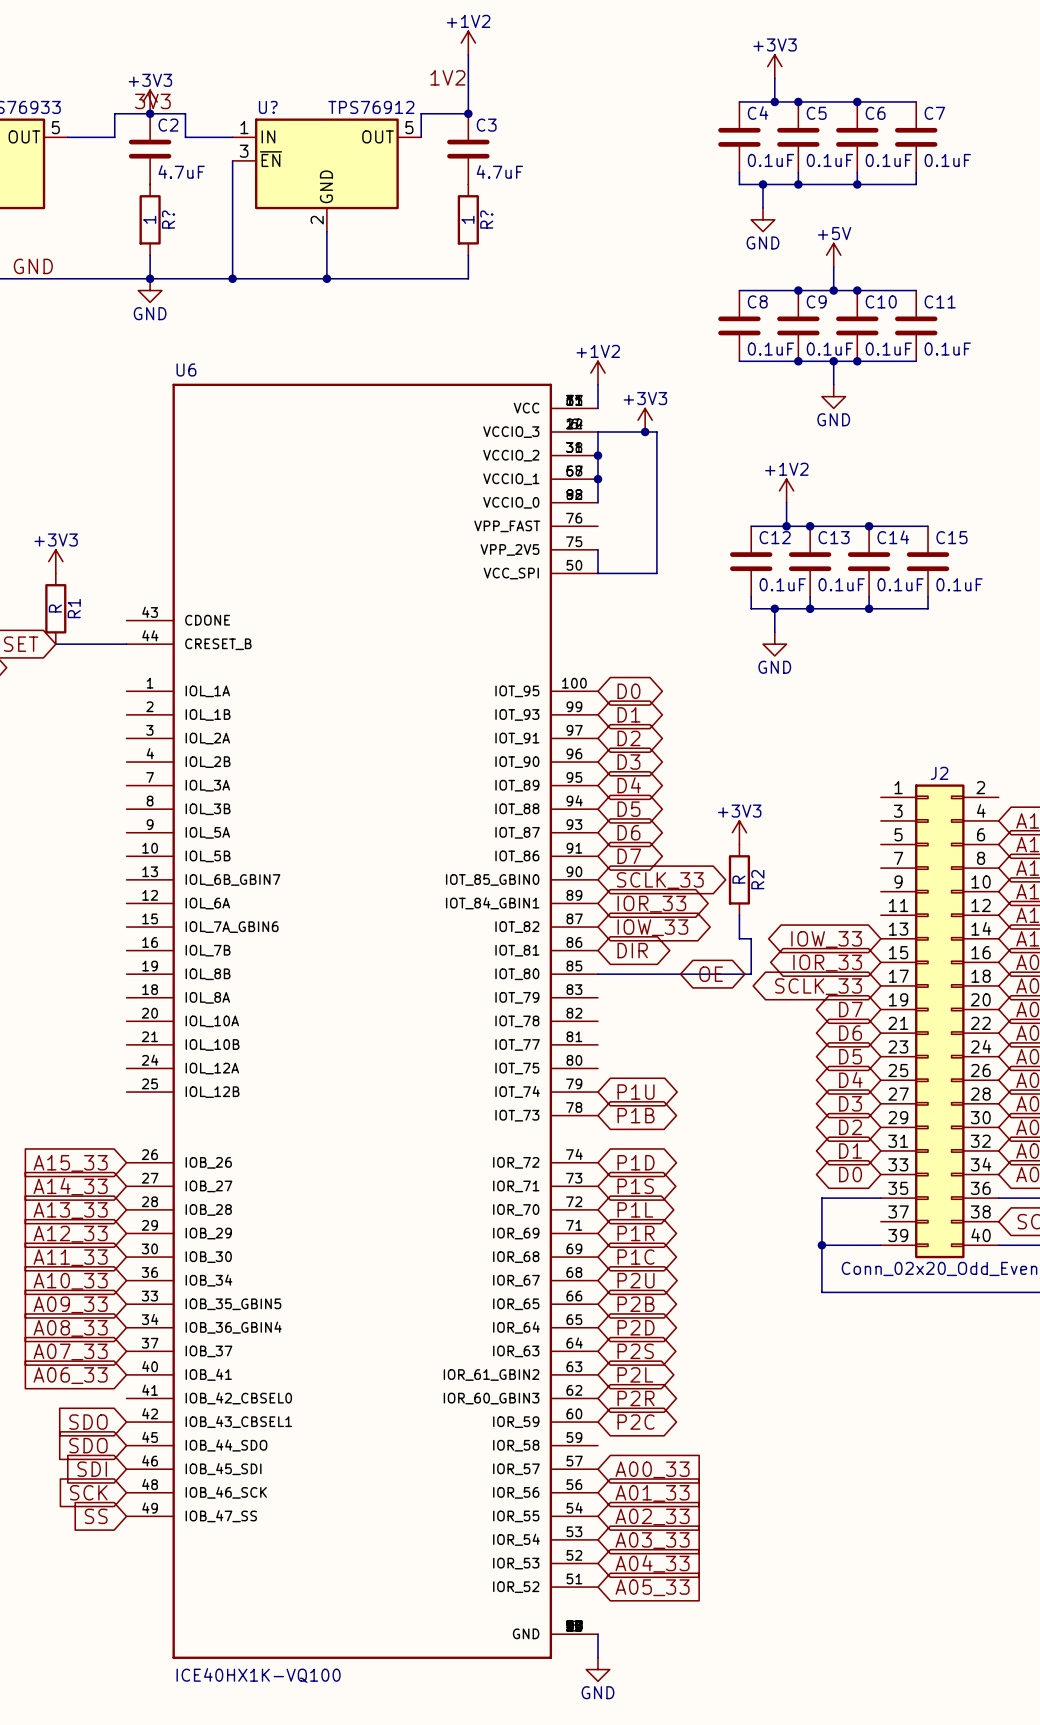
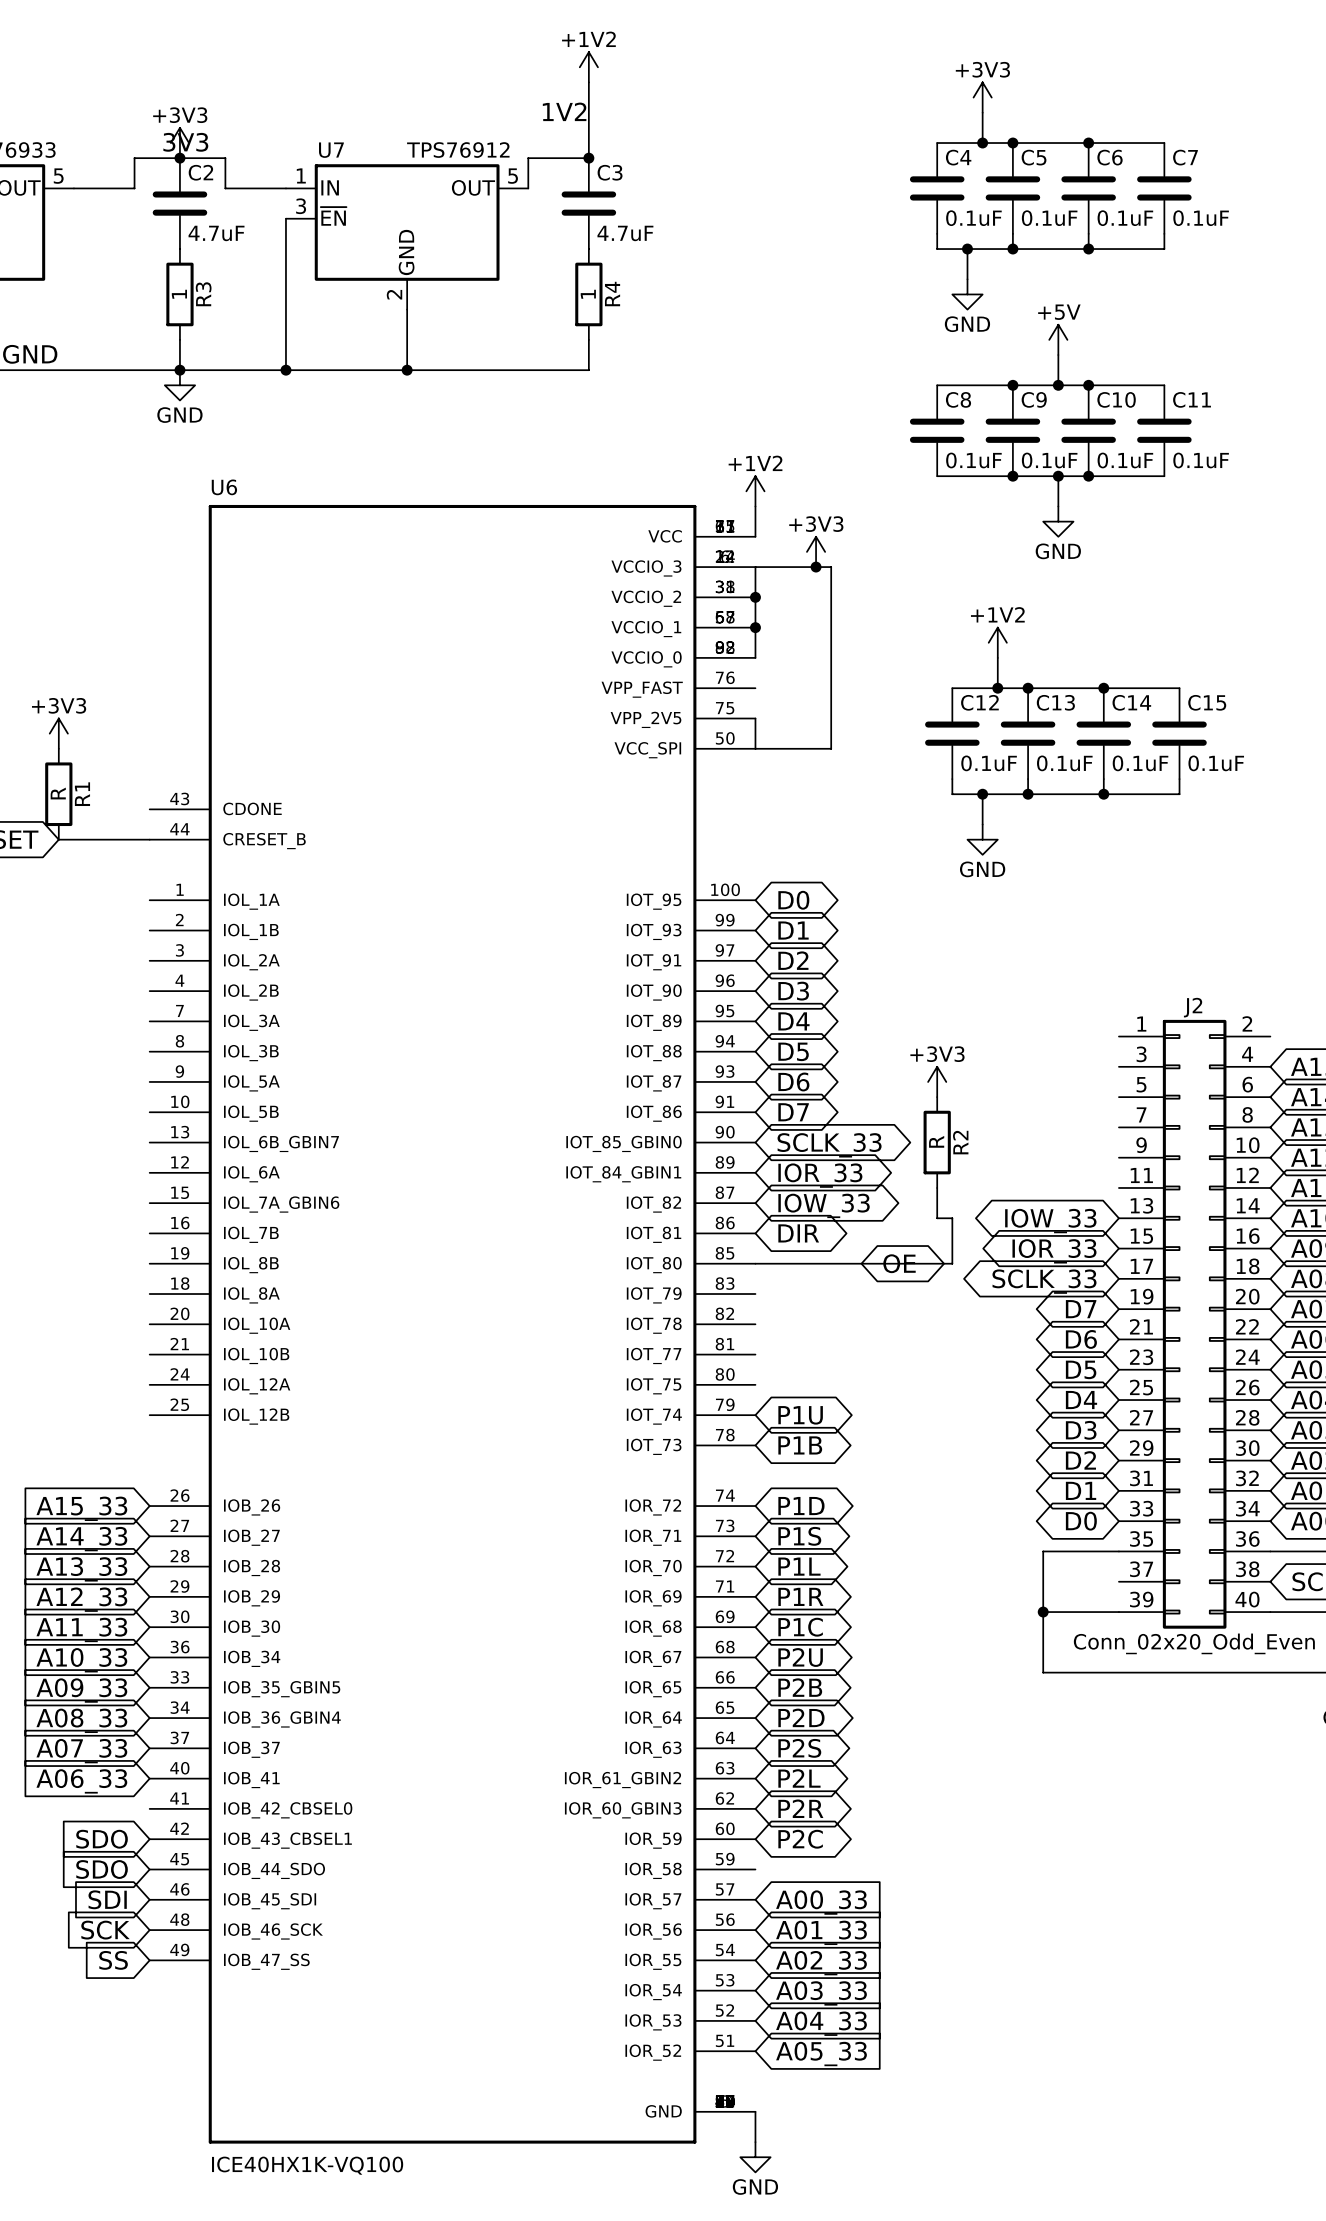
U? name: U? (268, 107) -> U7 (331, 150)
R? name: R? (168, 219) -> R3 (203, 294)
R? name: R? (486, 219) -> R4 (612, 294)

